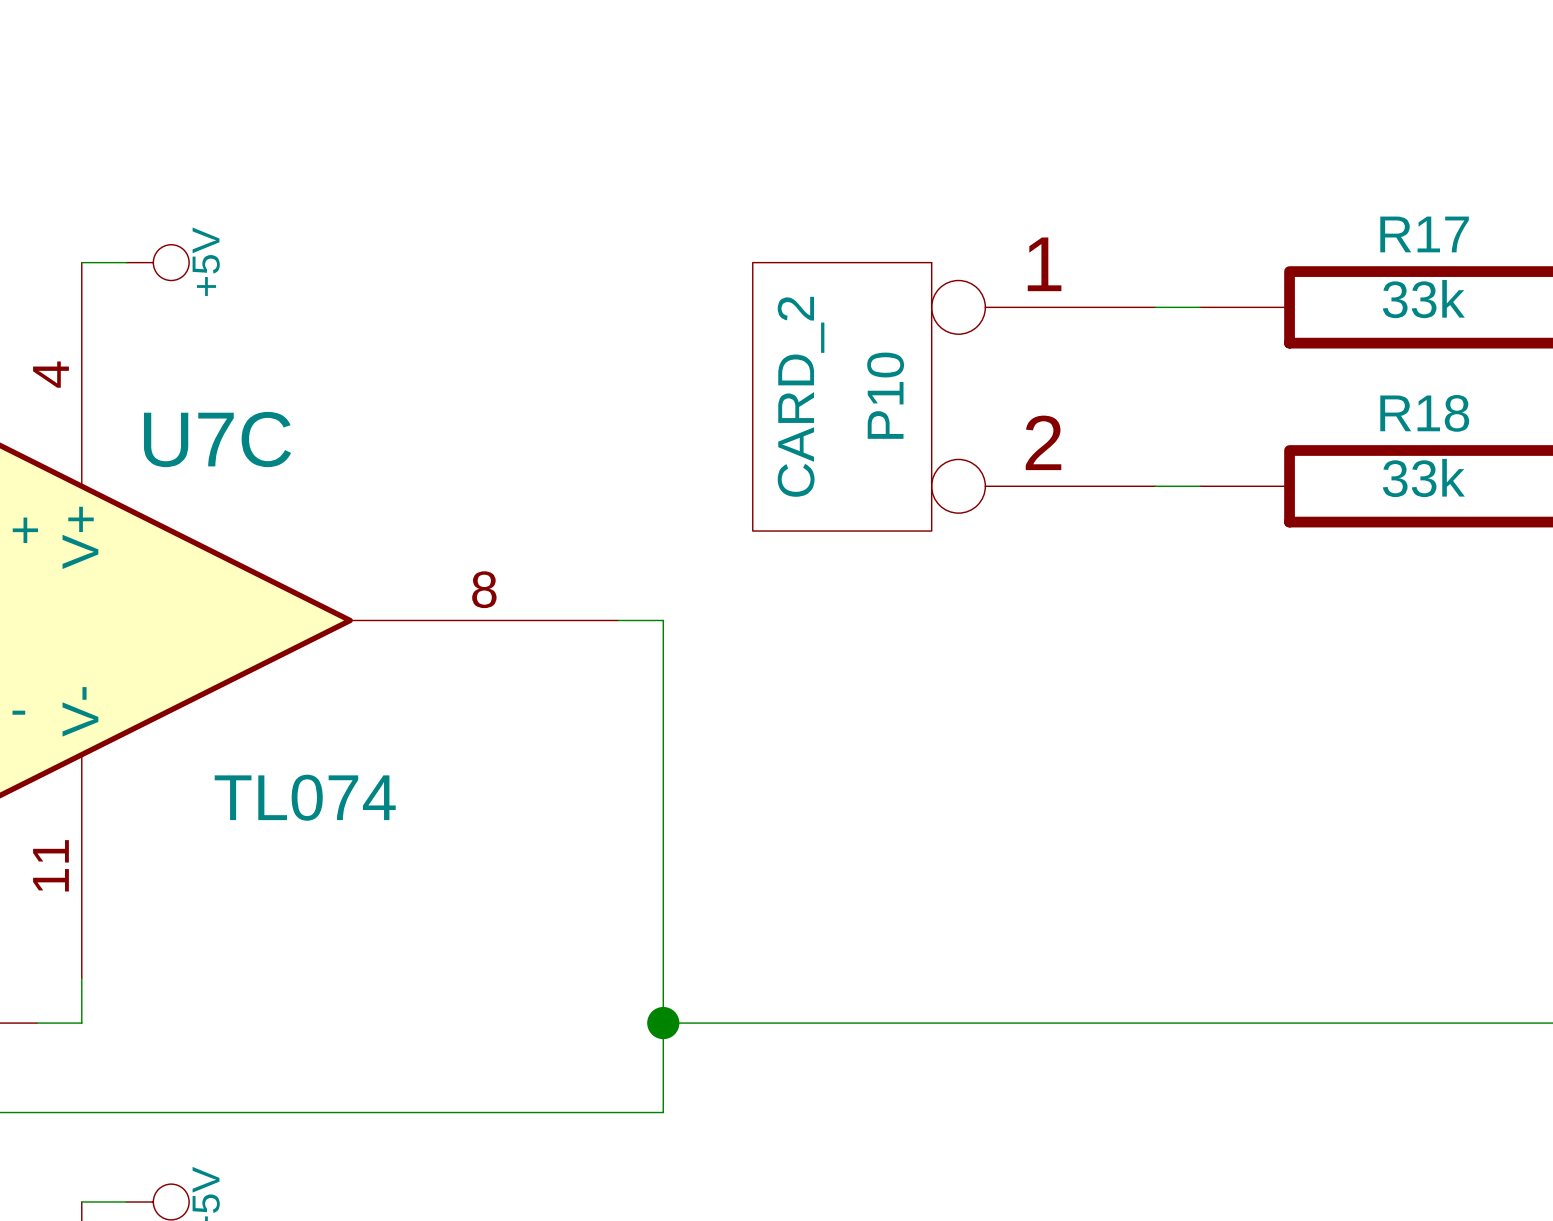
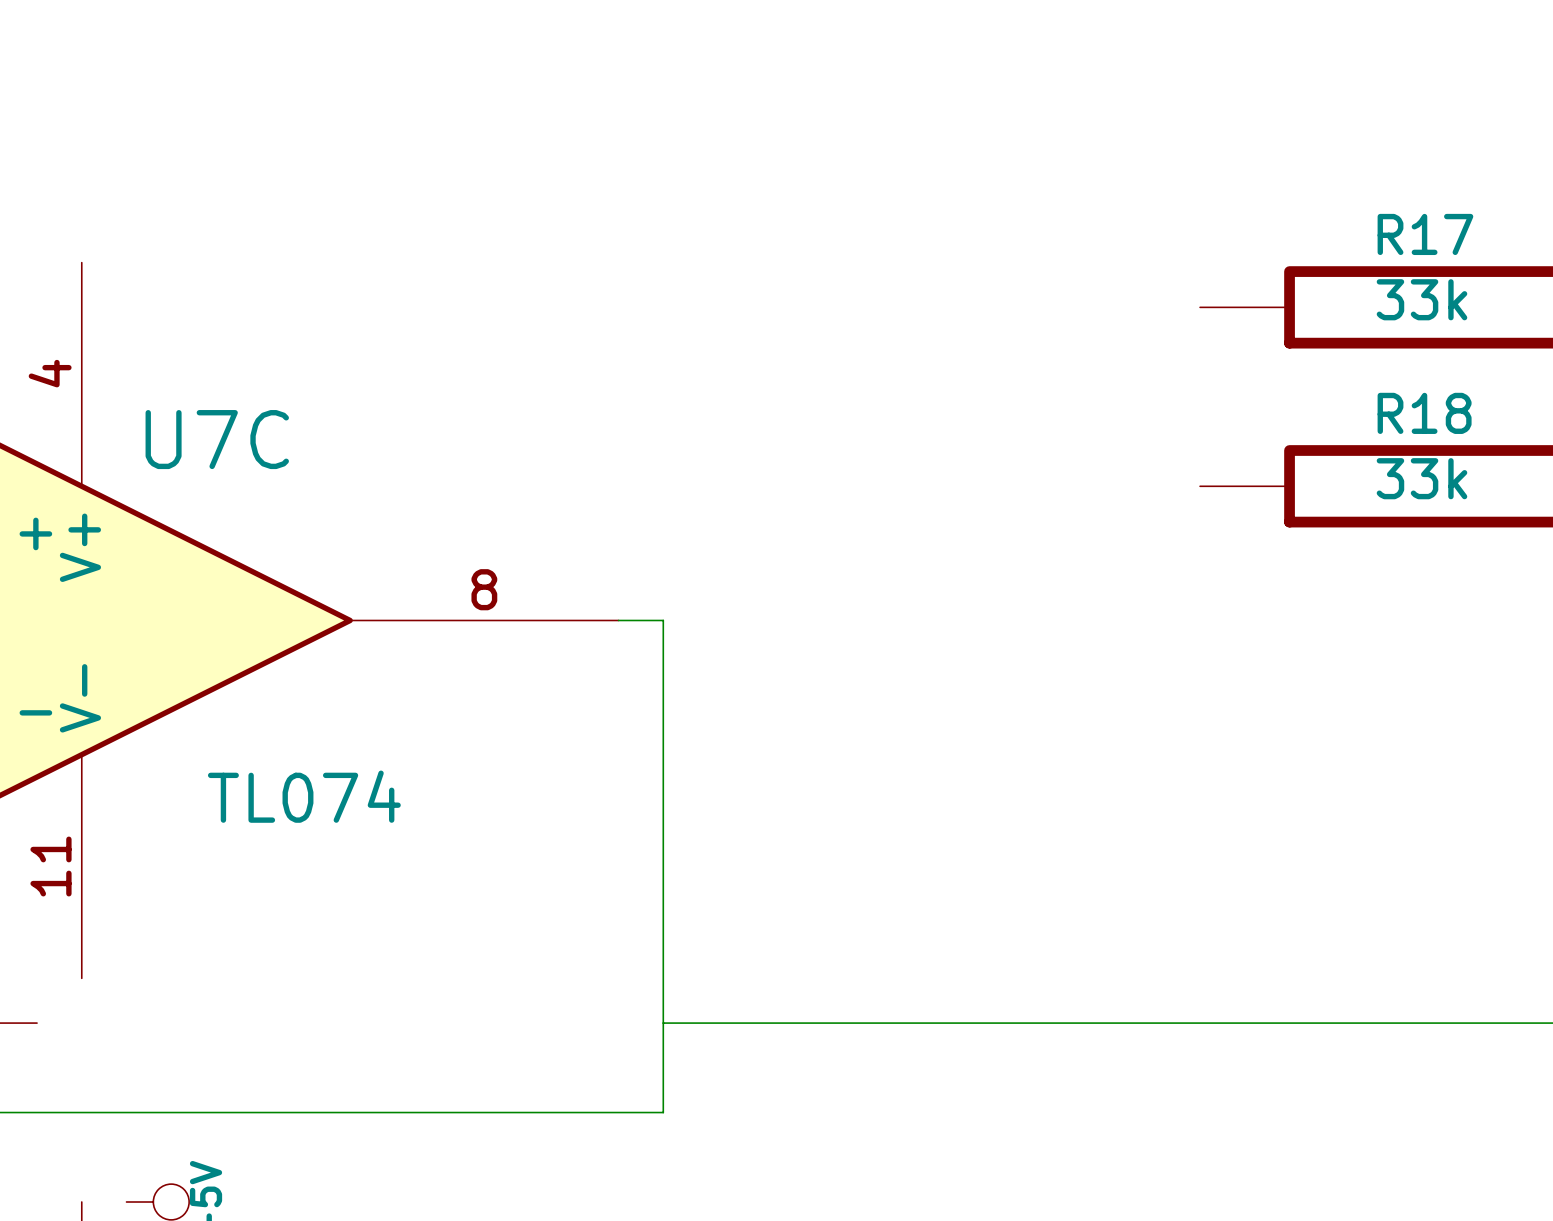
wire: (81, 262) (126, 262) -> none
power symbol: +5V (157, 262) -> none
wire: (1155, 307) (1200, 307) -> none
P10: CARD_2 (954, 396) -> none
wire: (1155, 486) (1200, 486) -> none
wire: (81, 978) (81, 1023) (37, 1023) -> none
junction: (663, 1023) -> none
wire: (81, 1202) (126, 1202) -> none

